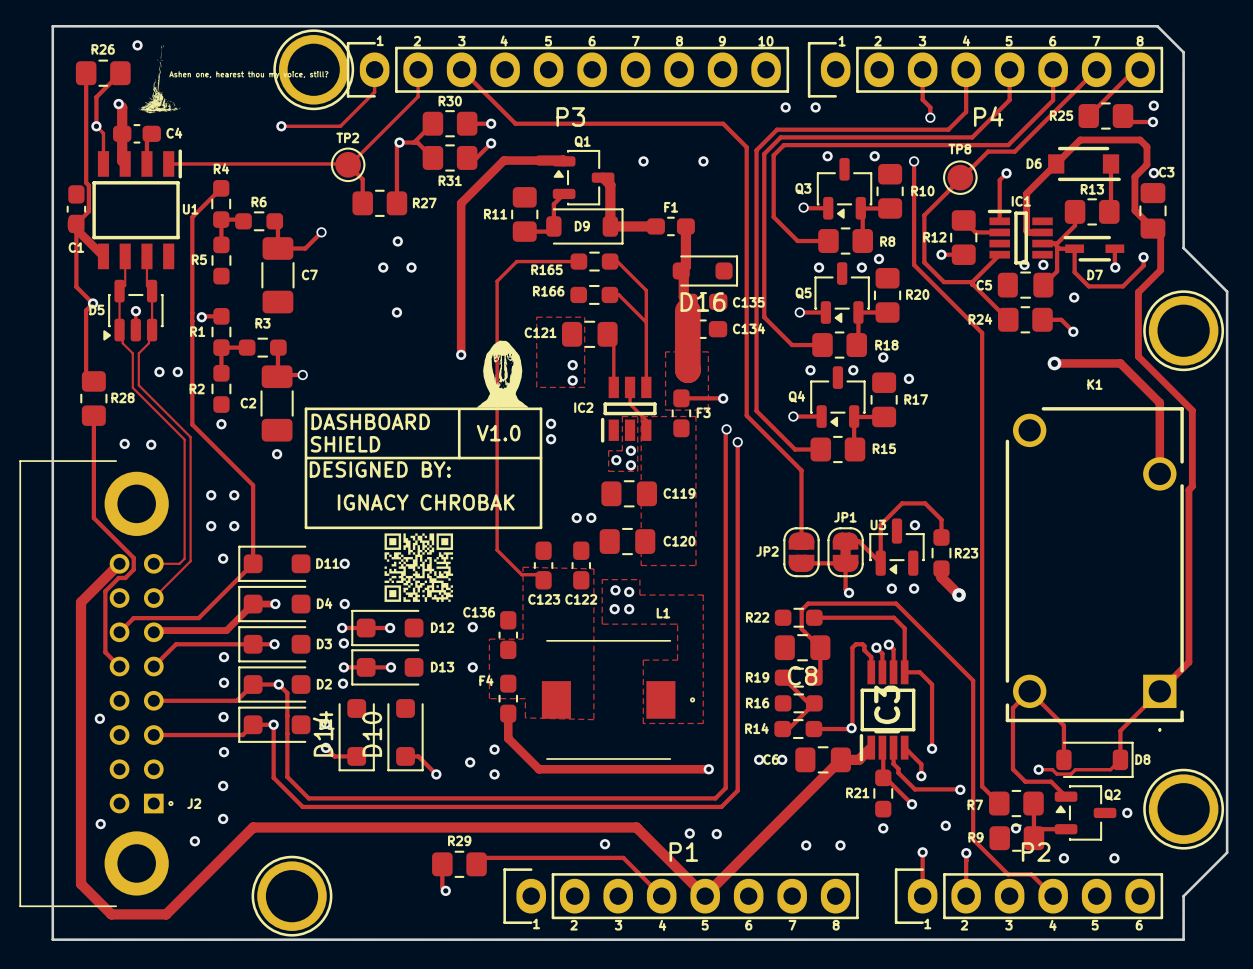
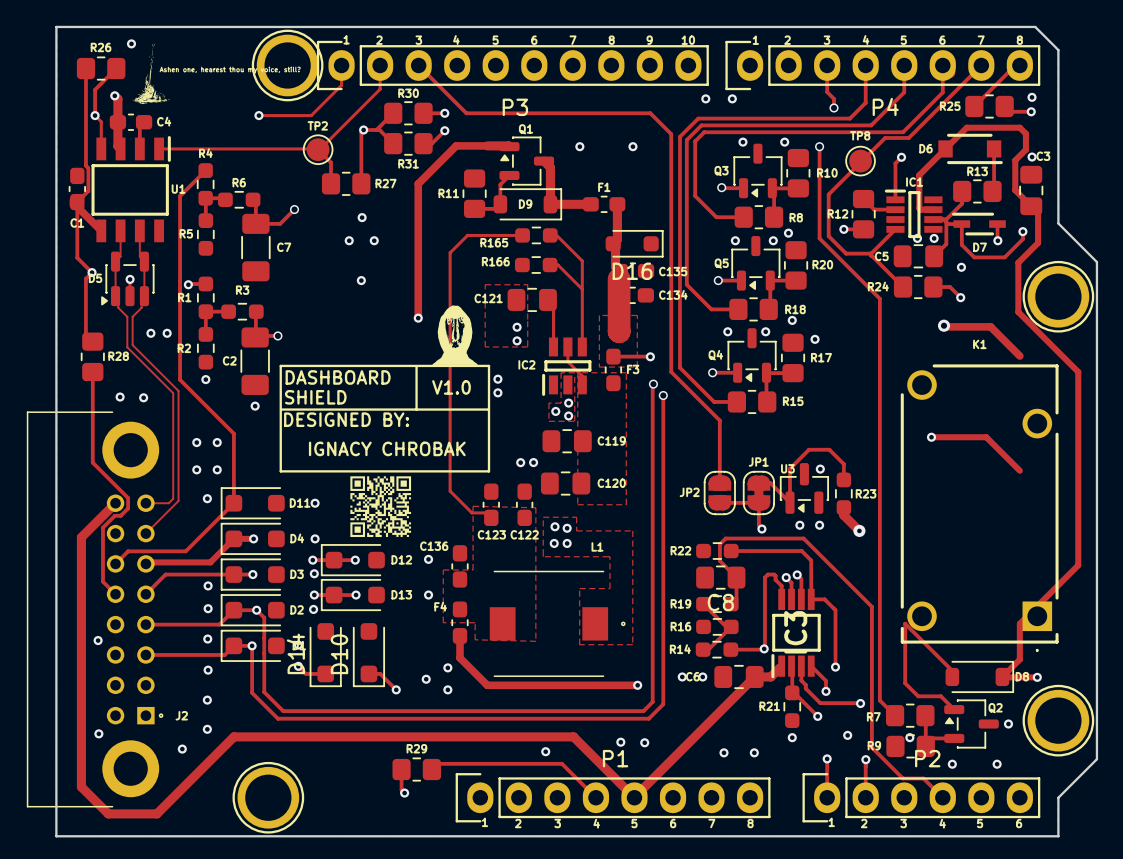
track: (1138, 348) (1138, 356) (1192, 410) (1192, 486) (1188, 489) (1188, 662) (1120, 730) (1120, 759) (1110, 769) (1075, 769) (1071, 774) (1056, 774) (1052, 769) (1038, 769) -> (1018, 312) (1078, 371) (1078, 565) (1019, 623) (1019, 659) (1002, 676) (1037, 677)
track: (1054, 363) (1120, 363) (1159, 402) (1159, 473) -> (944, 325) (990, 326) (1019, 356)
track: none -> (931, 437) (986, 437) (1019, 470)
via: none -> (931, 437)
track: (1028, 690) (1063, 725) (1063, 753) -> none
track: (1029, 691) (1012, 708) (1012, 769) -> (952, 670) (905, 623) (905, 683) (907, 685)
via: none -> (1037, 677)
via: (1038, 769) -> none

